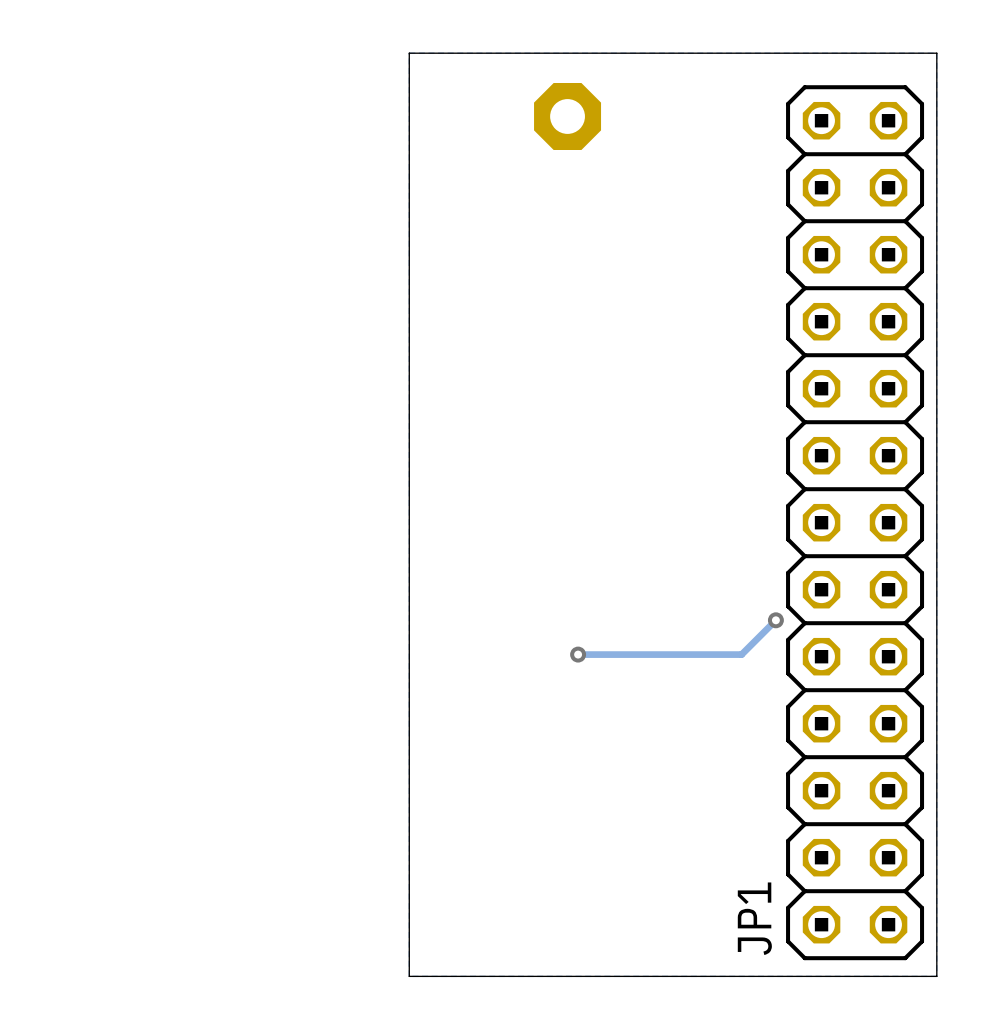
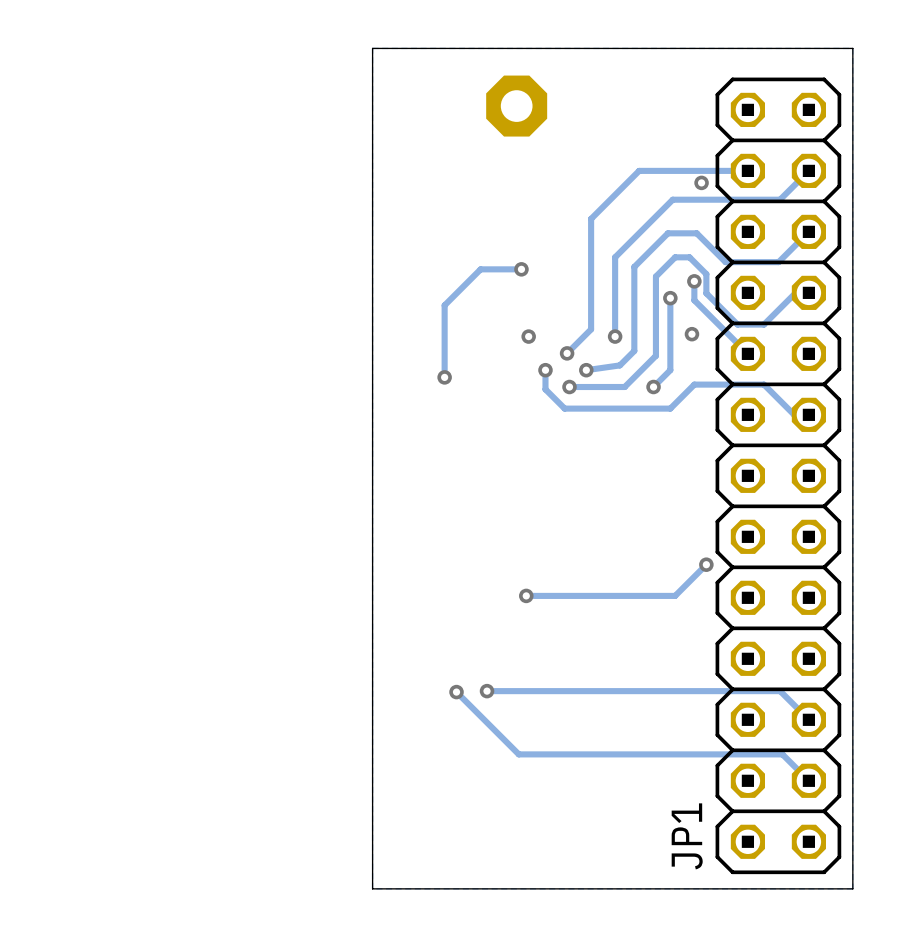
track: none -> (747, 170) (639, 170) (591, 218) (591, 329) (567, 353)
track: none -> (808, 170) (780, 199) (672, 199) (615, 257) (615, 336)
via: none -> (701, 182)
track: none -> (808, 231) (778, 262) (725, 262) (696, 233) (667, 233) (634, 266) (634, 350) (619, 365) (586, 370)
track: none -> (521, 269) (480, 269) (444, 305) (444, 377)
via: none -> (521, 269)
track: none -> (694, 281) (694, 300) (747, 353)
via: none -> (694, 281)
track: none -> (808, 292) (795, 292) (764, 324) (737, 324) (706, 293) (706, 274) (689, 257) (675, 257) (655, 276) (655, 355) (624, 387) (569, 387)
track: none -> (670, 298) (670, 370) (653, 387)
via: none -> (670, 298)
via: none -> (691, 334)
via: none -> (528, 336)
via: none -> (615, 336)
via: none -> (567, 353)
track: none -> (545, 370) (545, 389) (564, 408) (670, 408) (694, 384) (764, 384) (794, 414) (808, 414)
via: none -> (545, 370)
via: none -> (586, 370)
via: none -> (444, 377)
via: none -> (569, 387)
via: none -> (653, 387)
track: none -> (487, 691) (780, 691) (808, 719)
via: none -> (487, 691)
track: none -> (456, 692) (518, 754) (782, 754) (808, 780)
via: none -> (456, 692)

